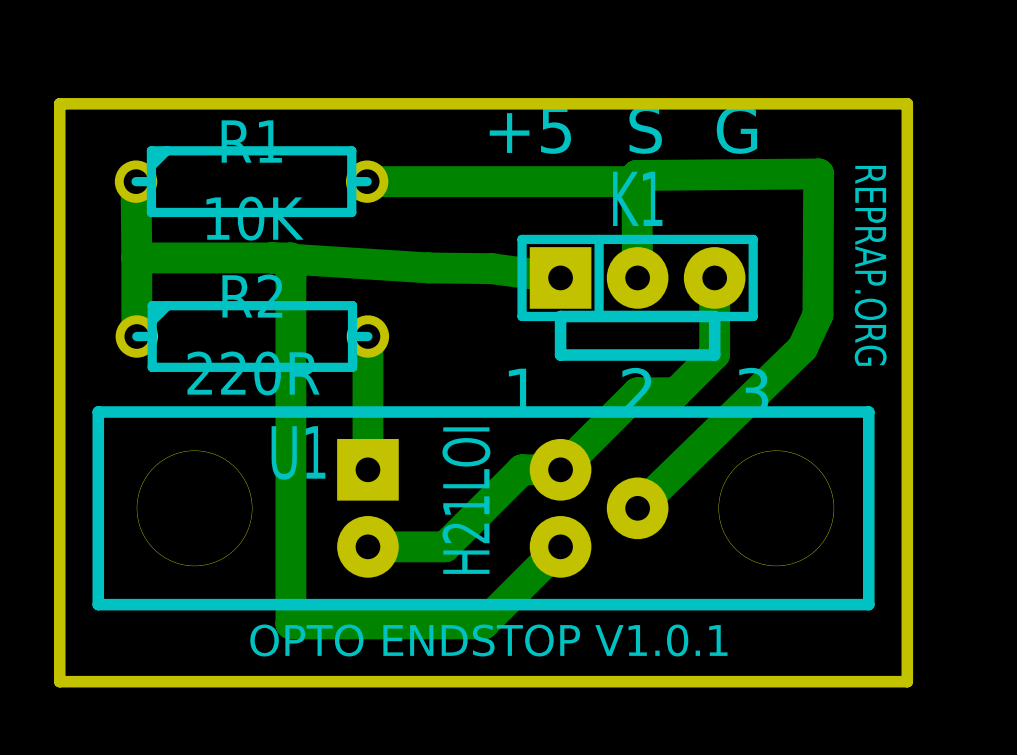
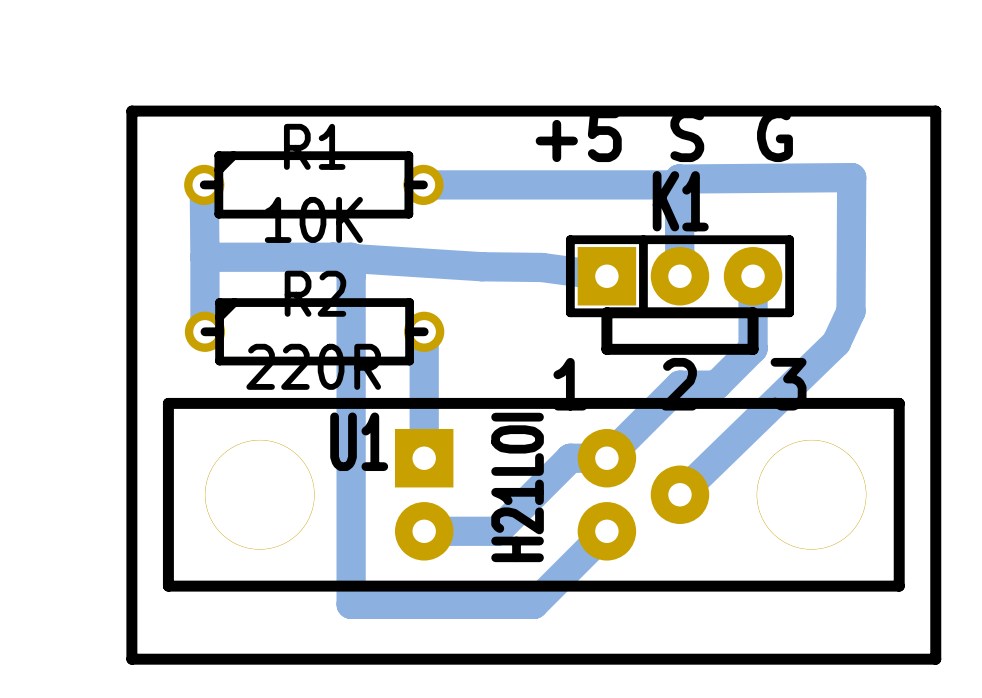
text: REPRAP.ORG (870, 265) -> none
text: OPTO ENDSTOP V1.0.1 (488, 640) -> none

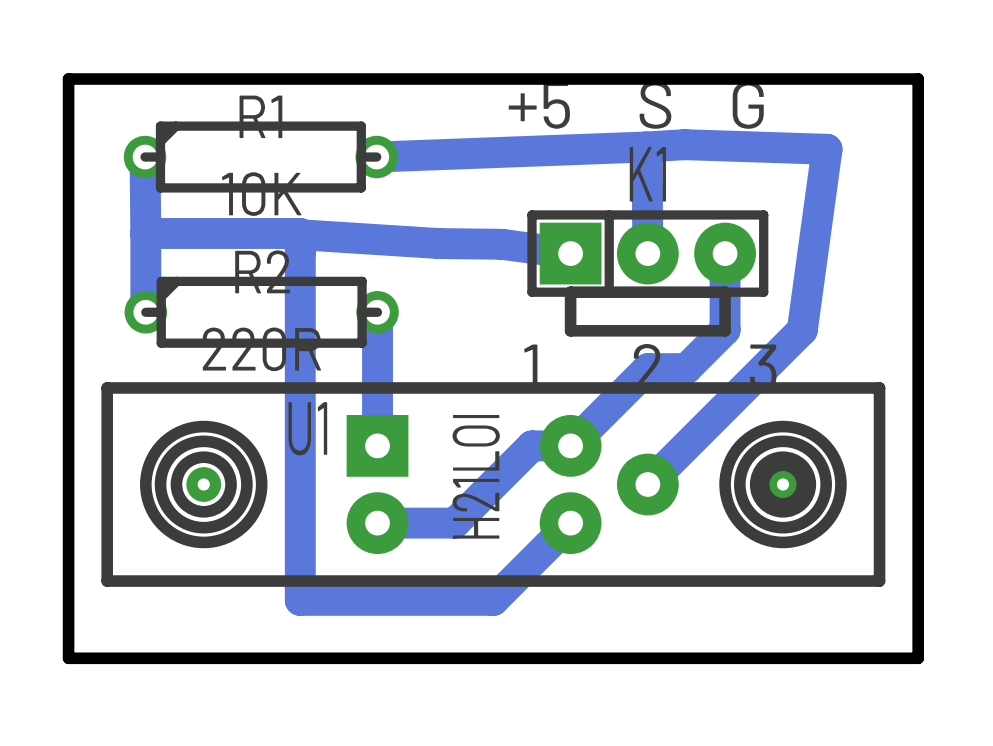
bottom track: (423, 184) (679, 184) (679, 179) (851, 177) (850, 311) (836, 342) (679, 494) -> (376, 157) (684, 144) (827, 149) (802, 330) (647, 484)
U1 footprint: [162, 397, 905, 592] -> [101, 382, 886, 587]

